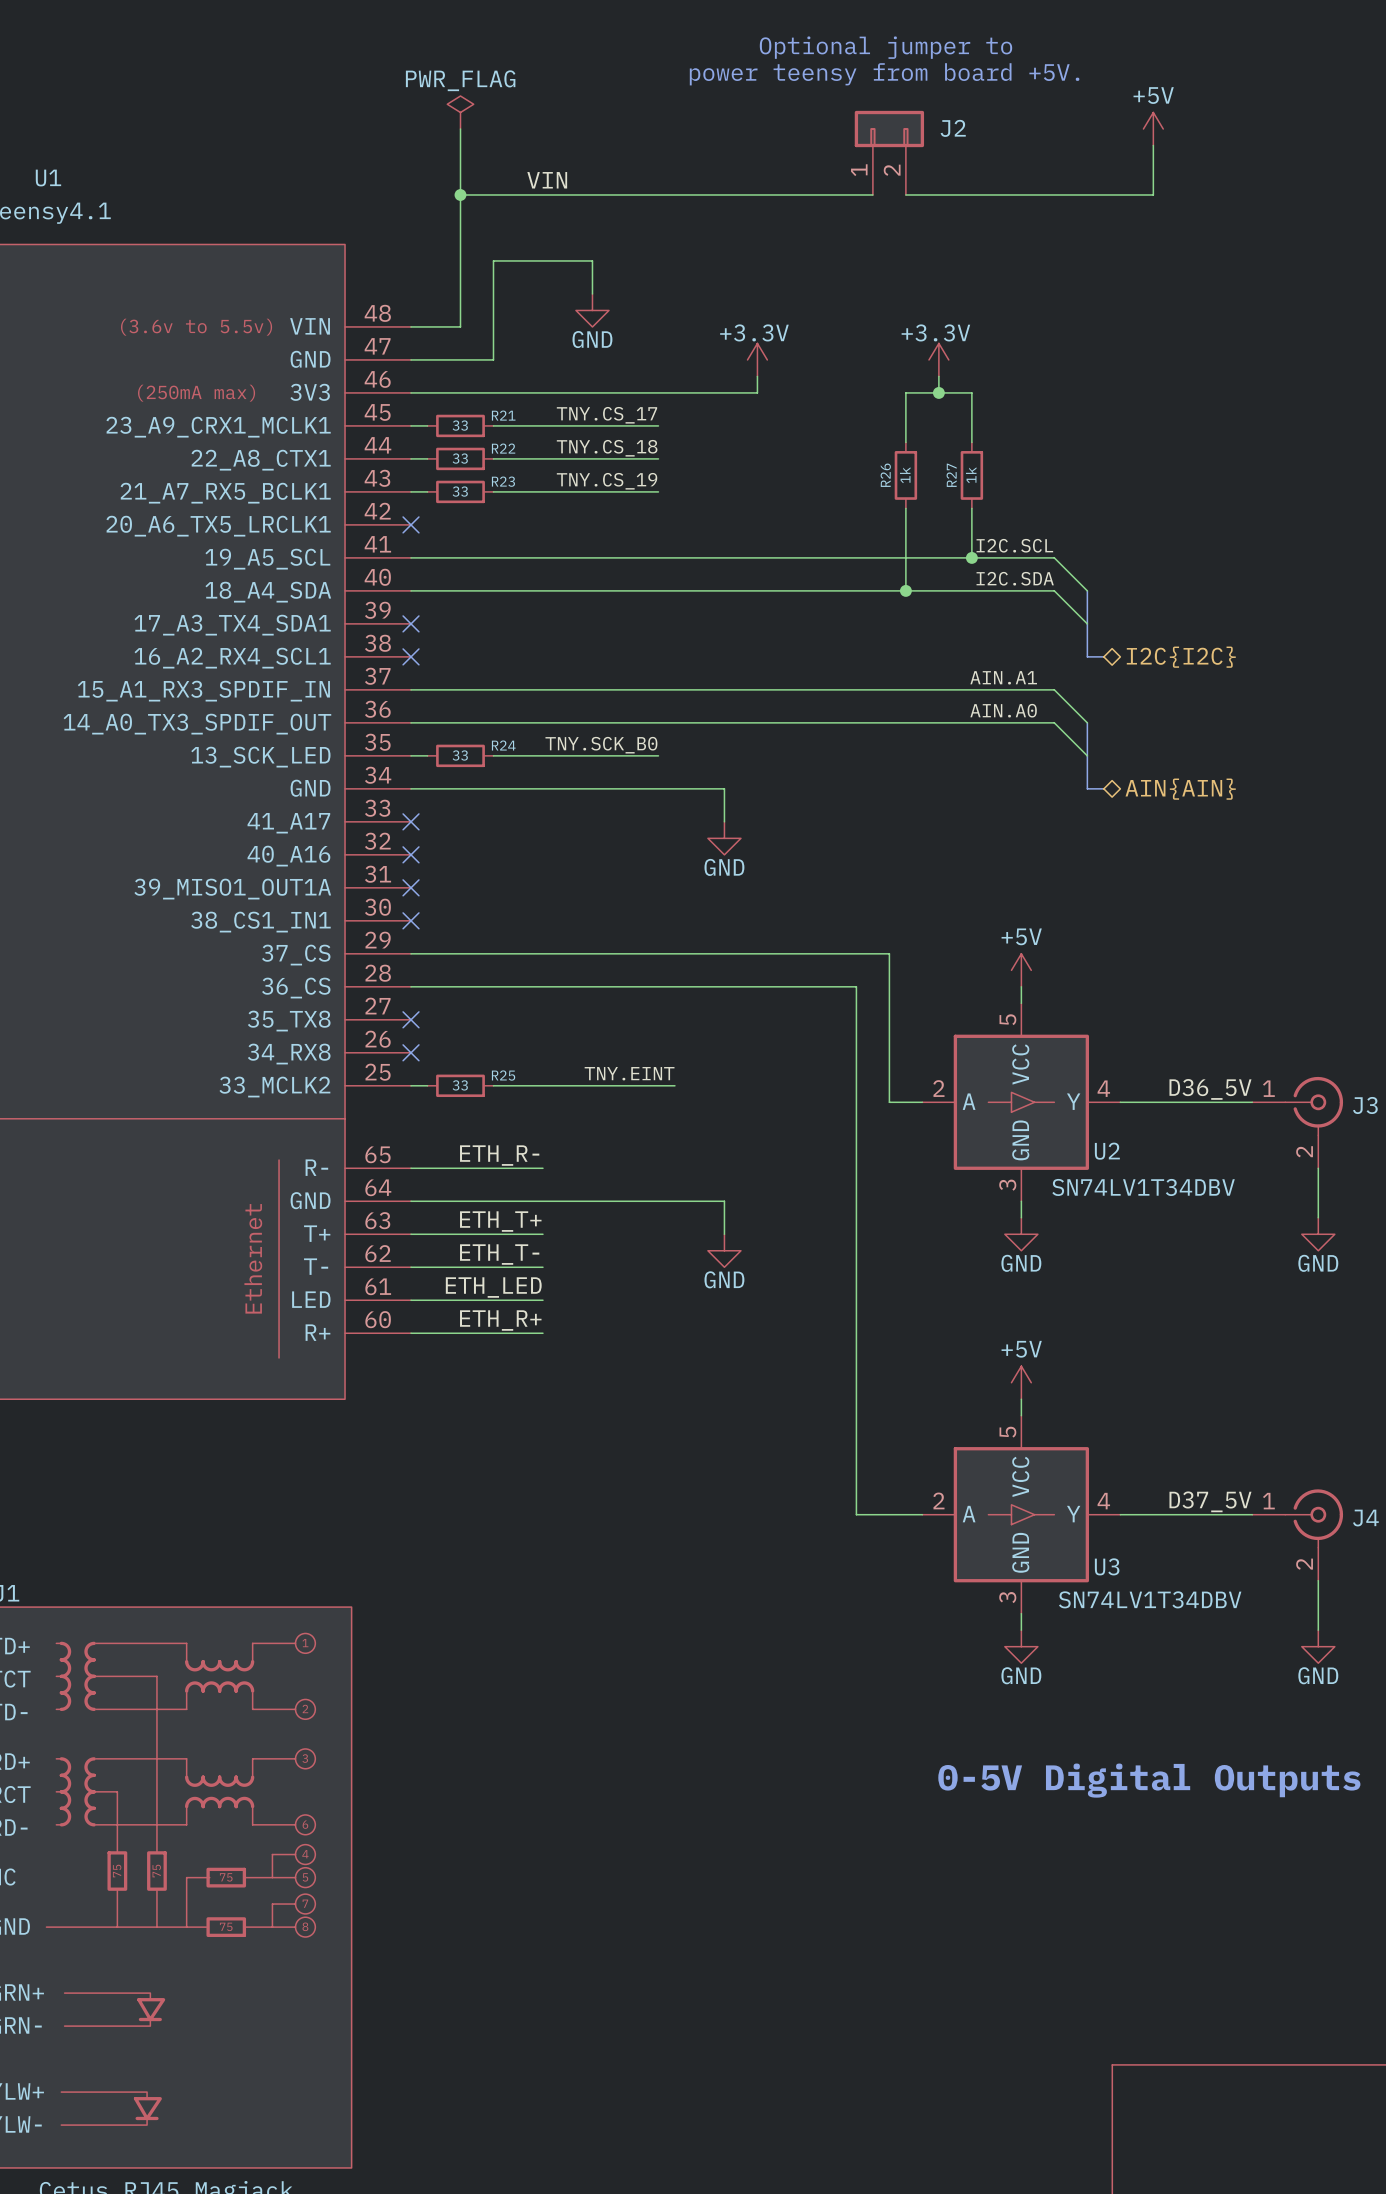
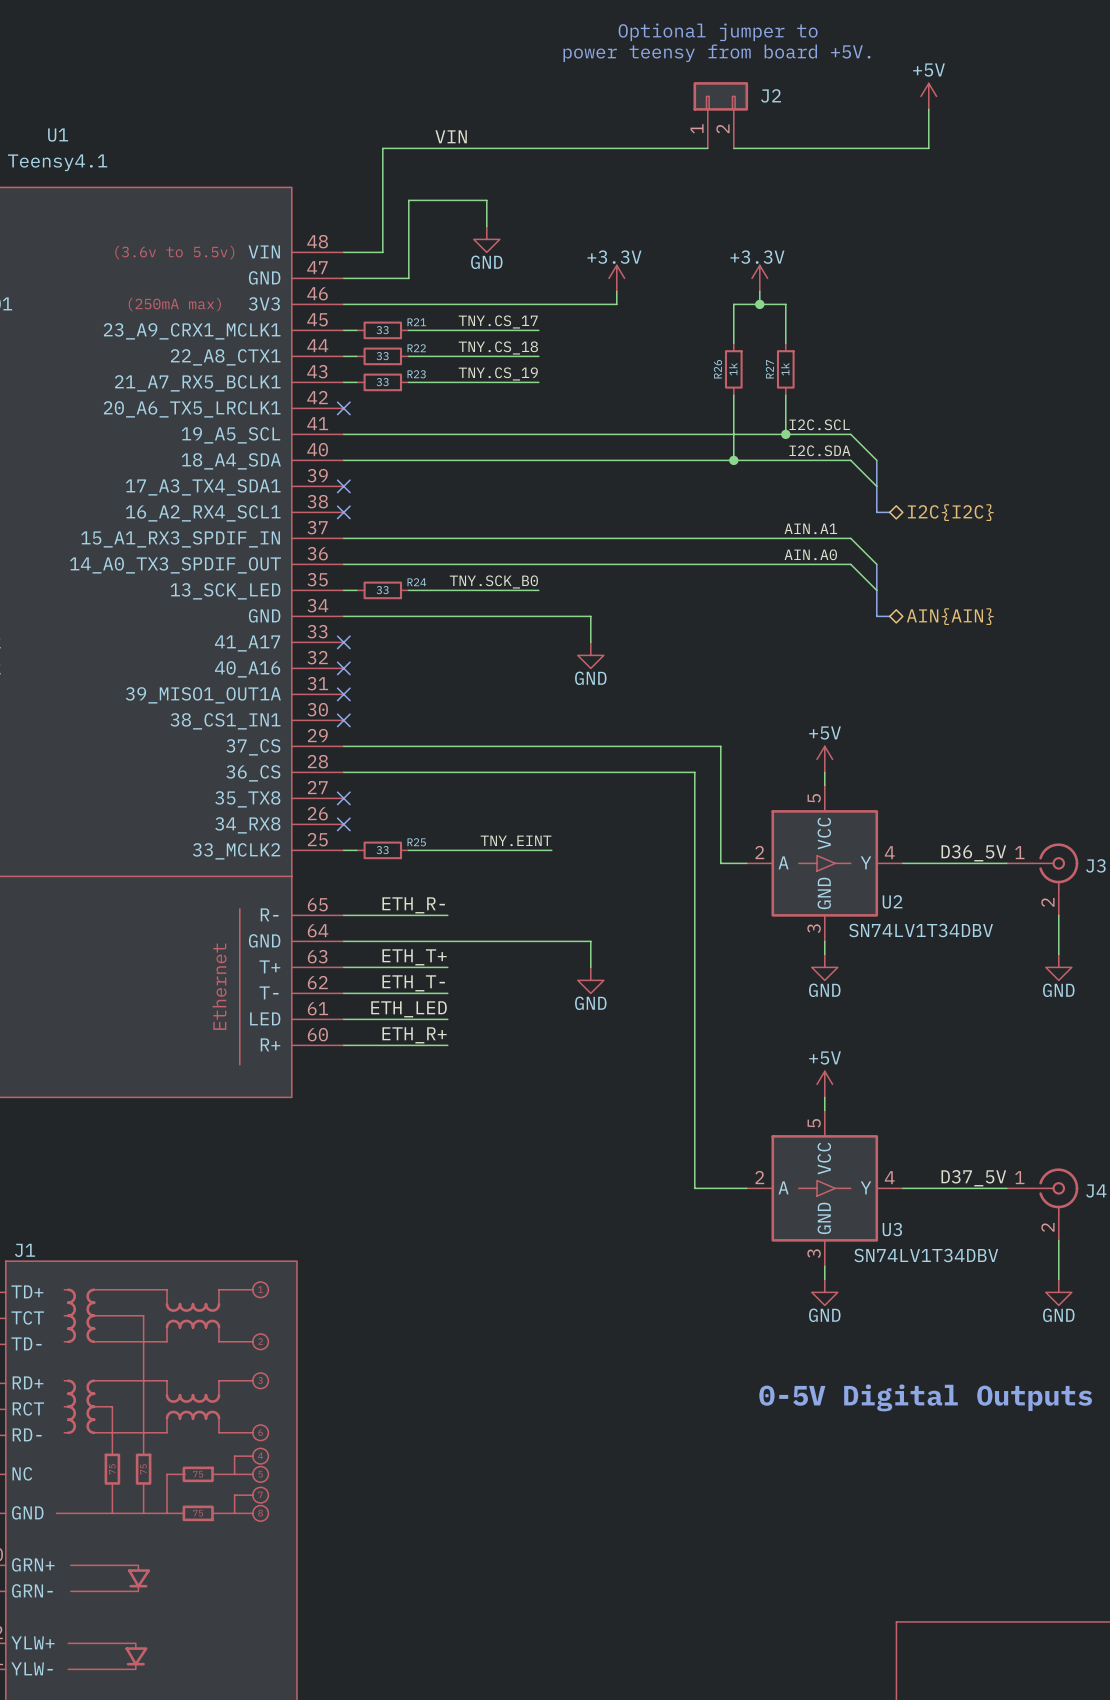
power symbol: PWR_FLAG (460, 112) -> none
wire: (460, 129) (460, 194) -> none
junction: (460, 194) -> none

